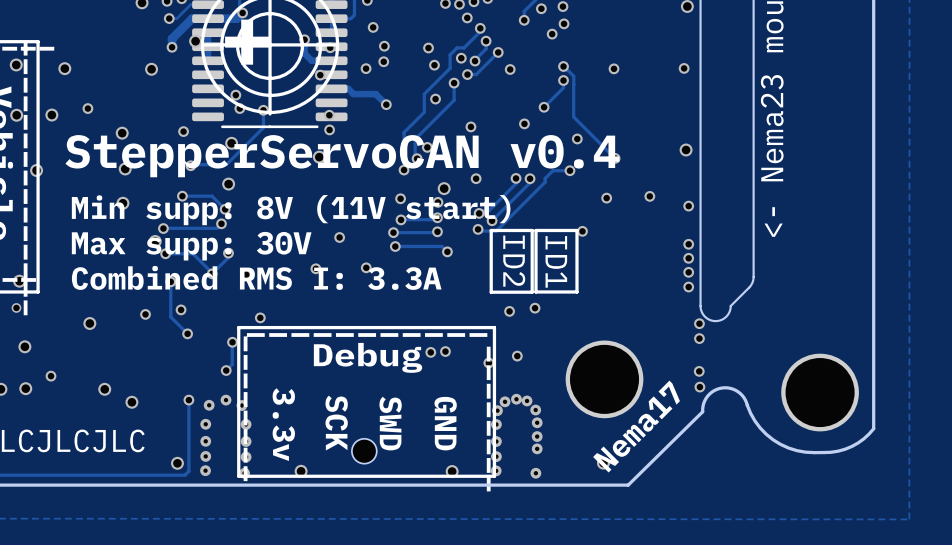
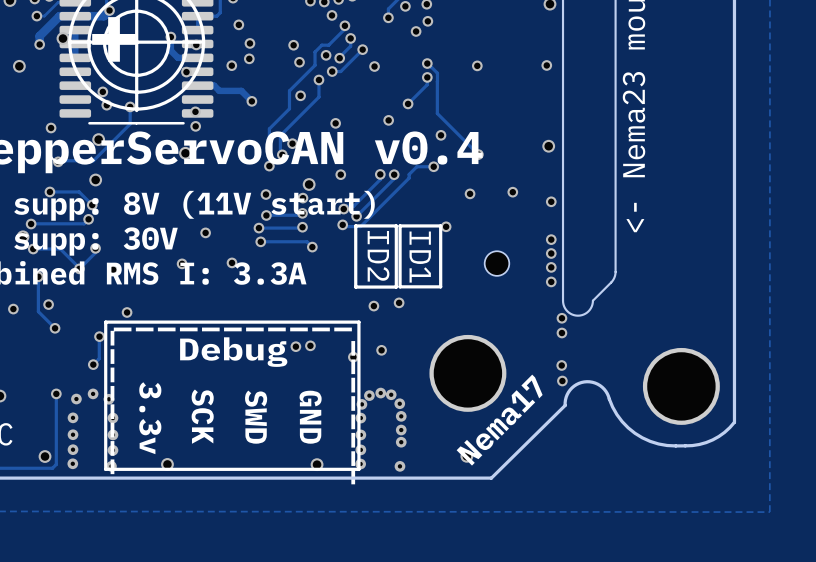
part position: (364, 451) -> (496, 263)

